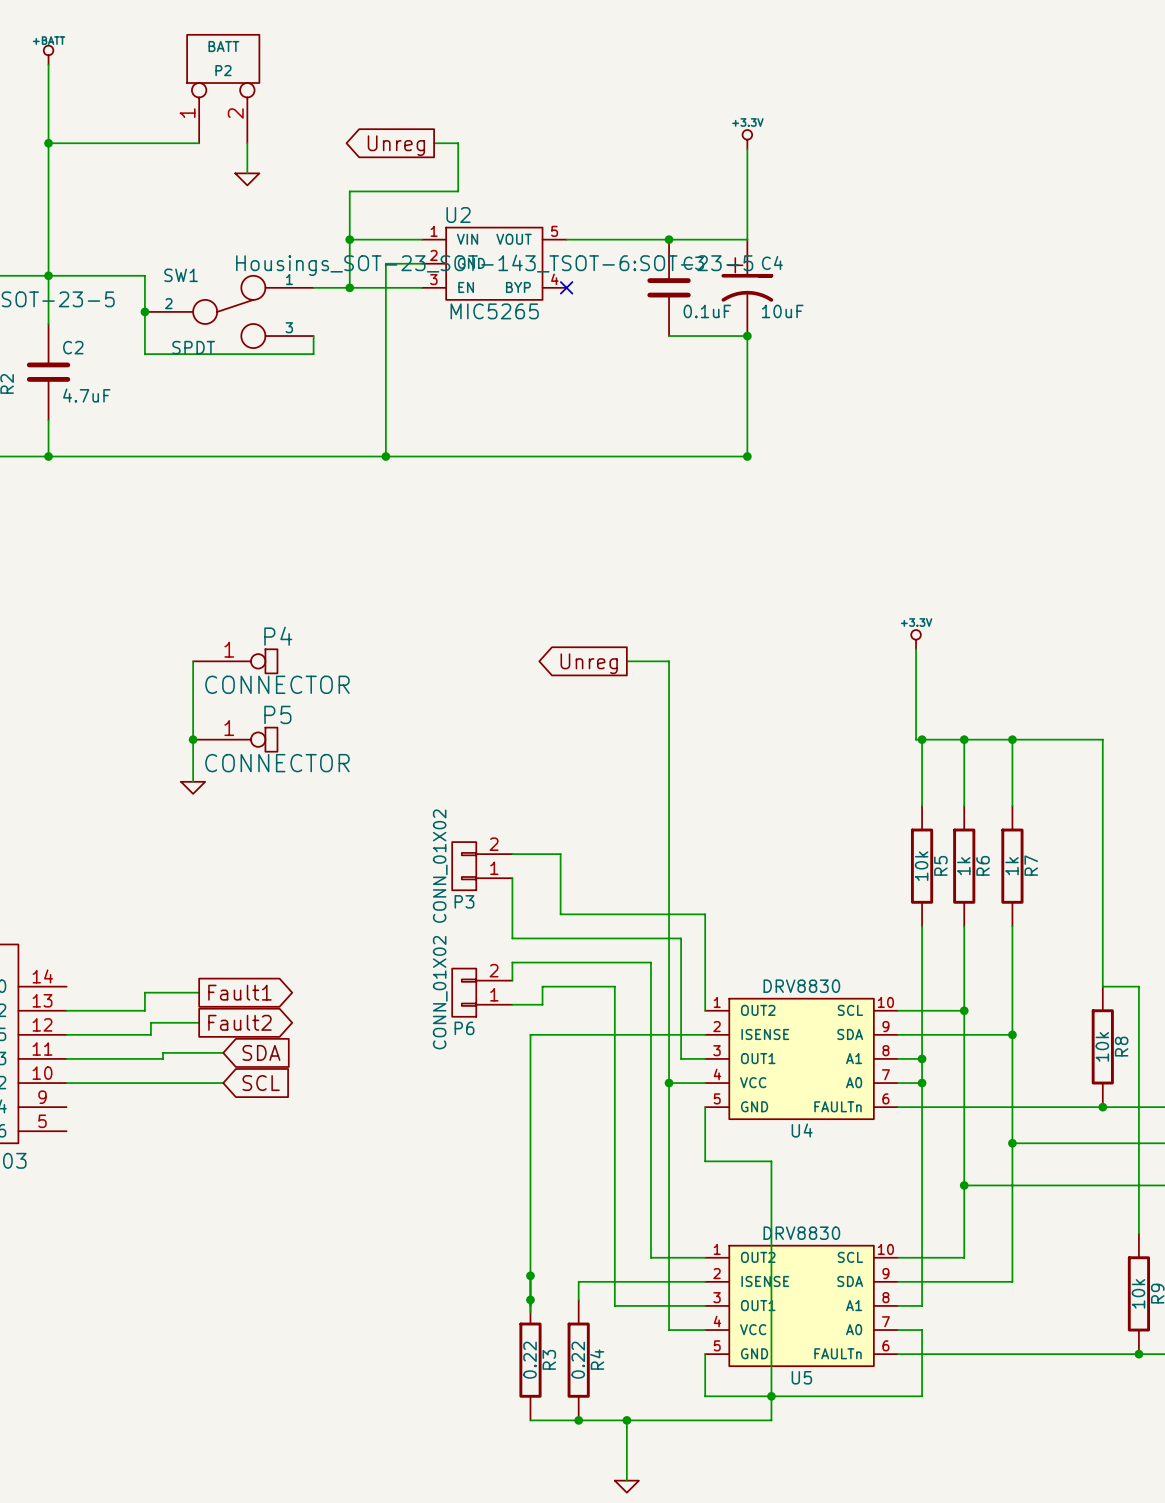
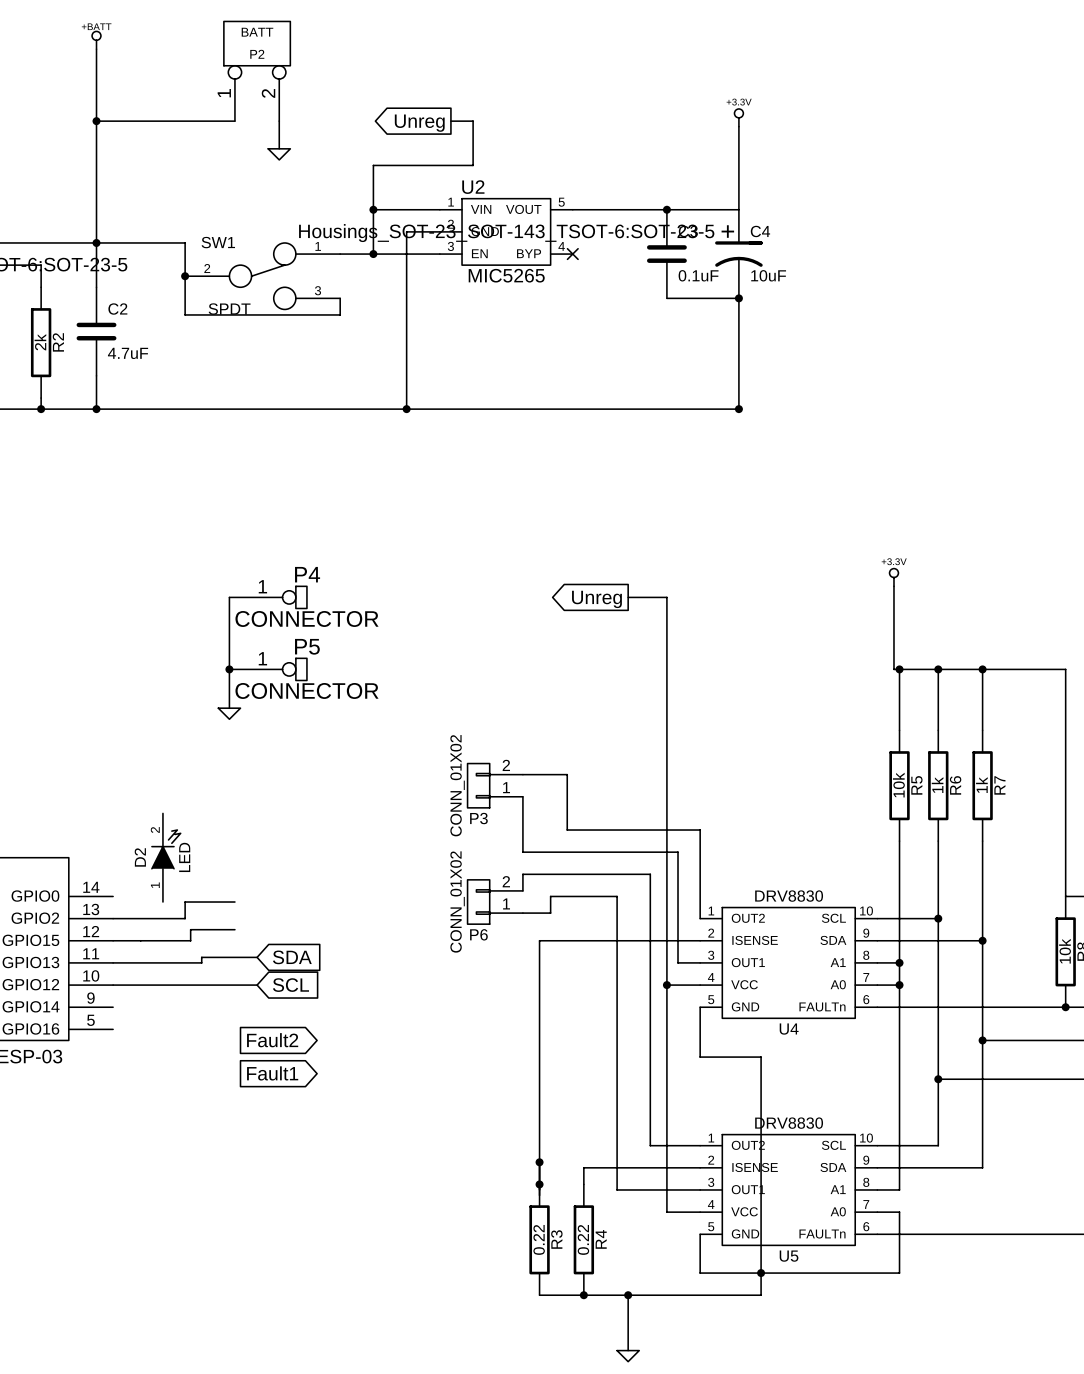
D2: none -> LED (166, 857)
global label position: Fault1 (239, 992) -> Fault1 (272, 1073)
global label position: Fault2 (239, 1022) -> Fault2 (272, 1040)

